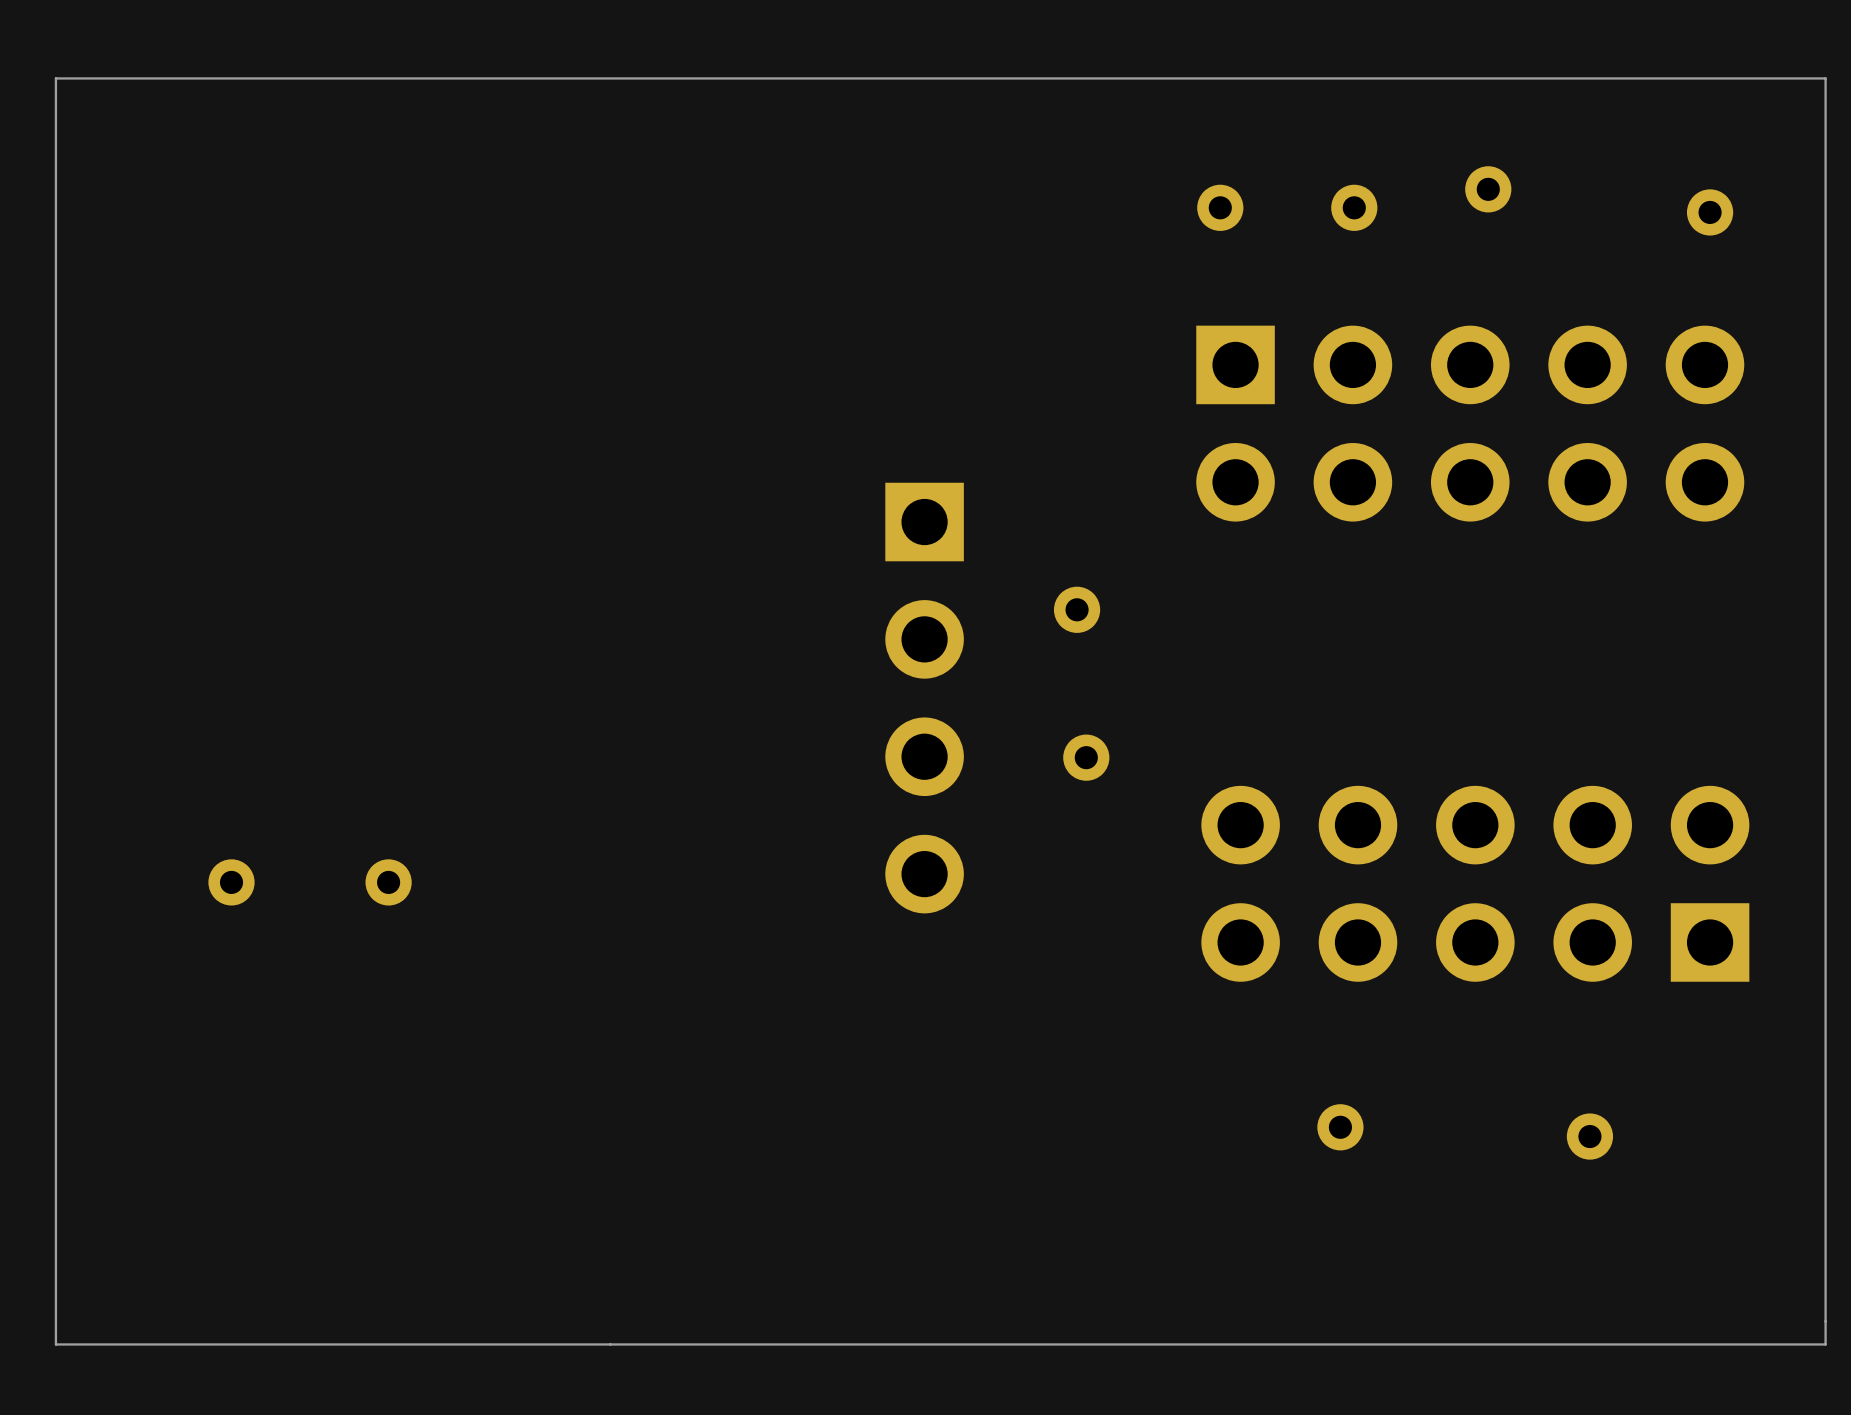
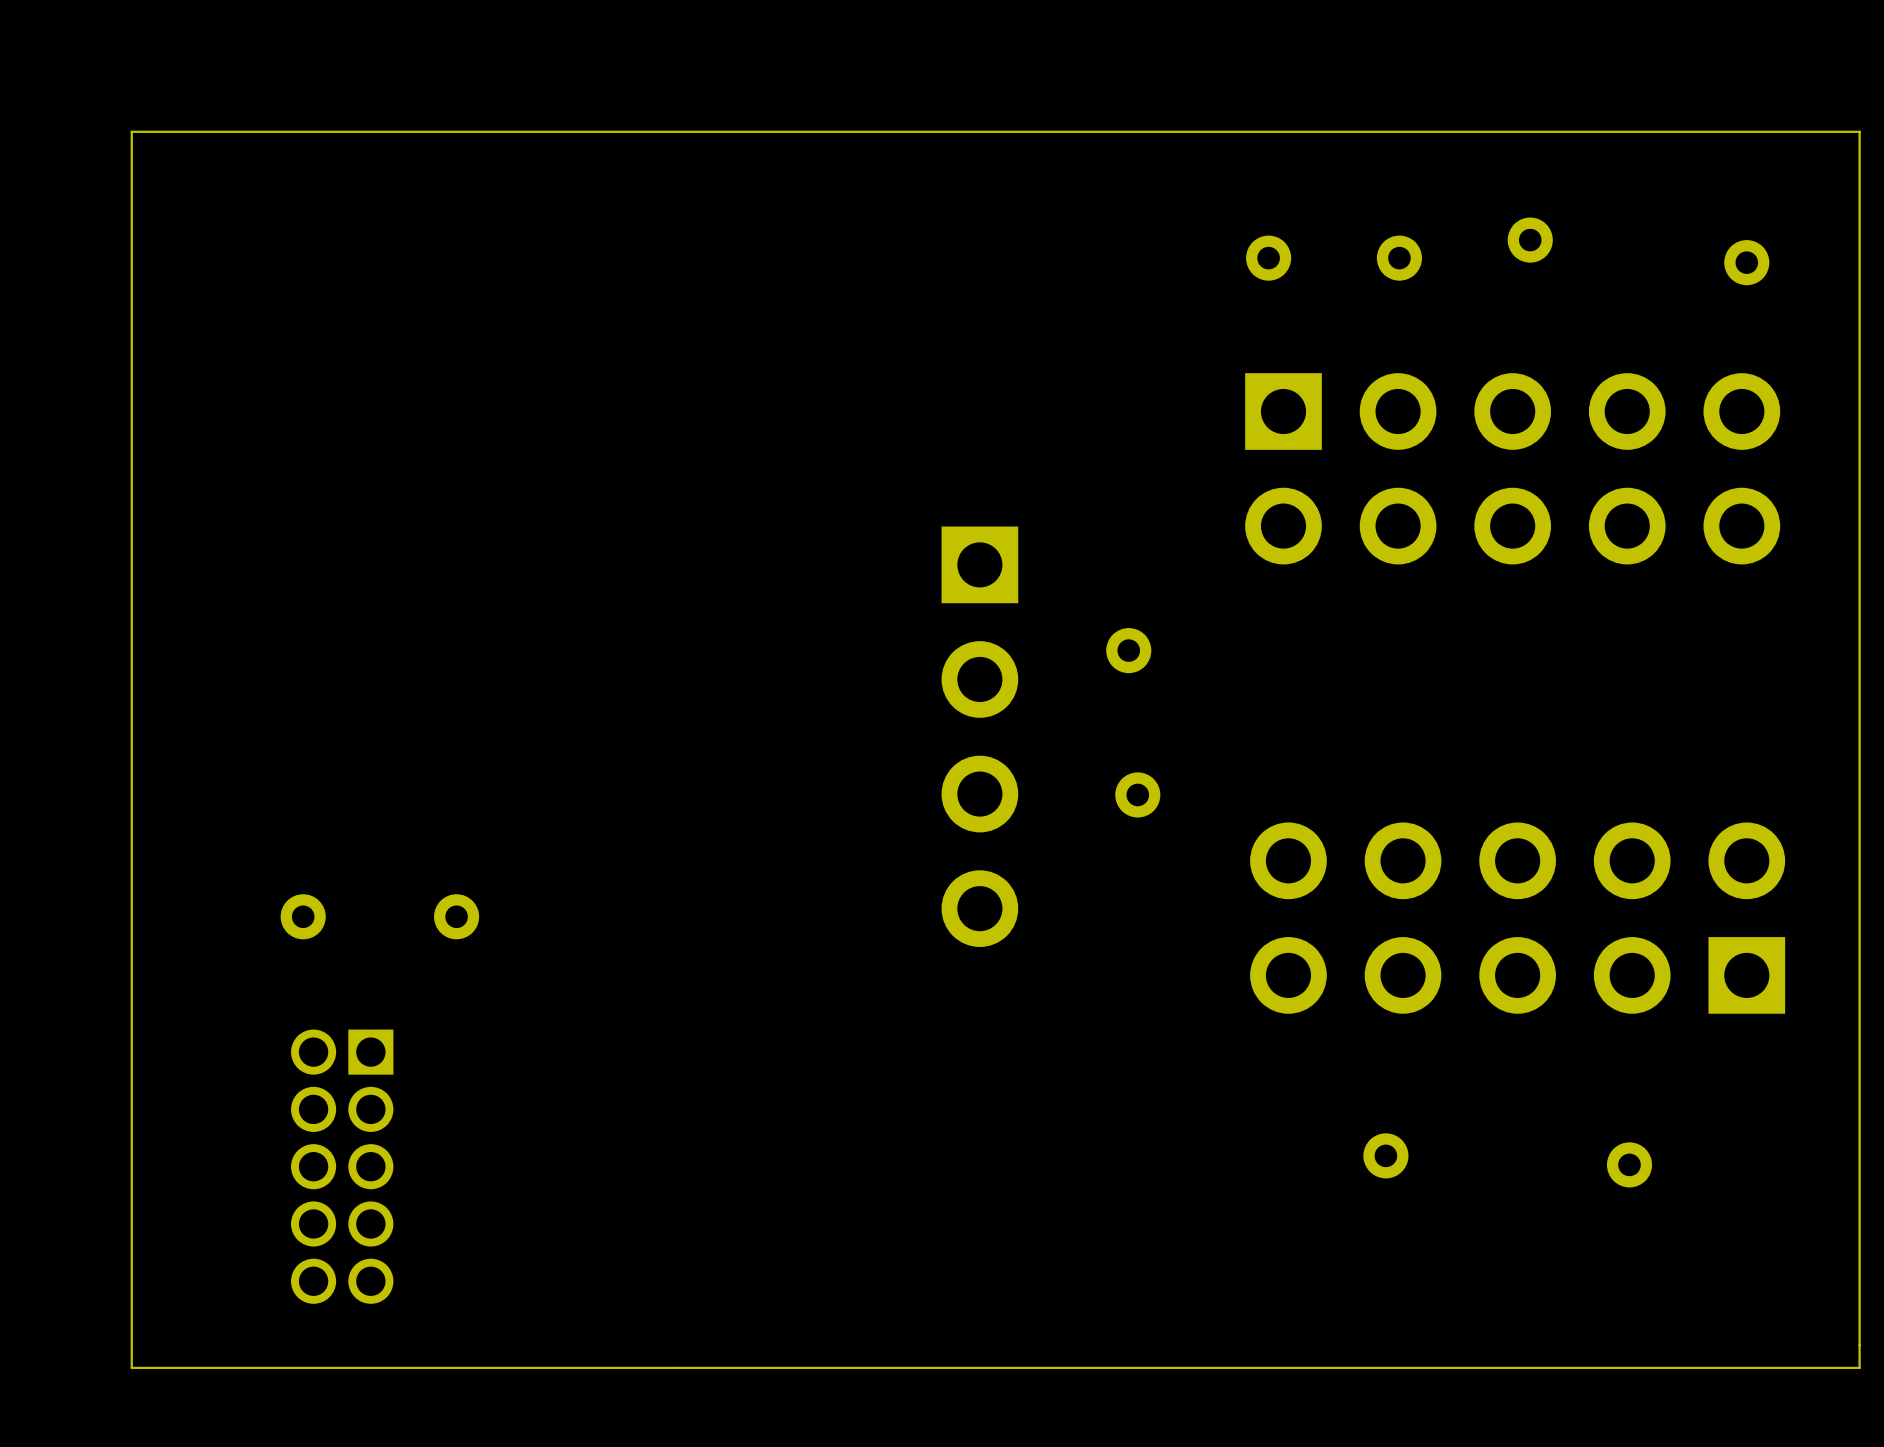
part: none -> (342, 1166)

